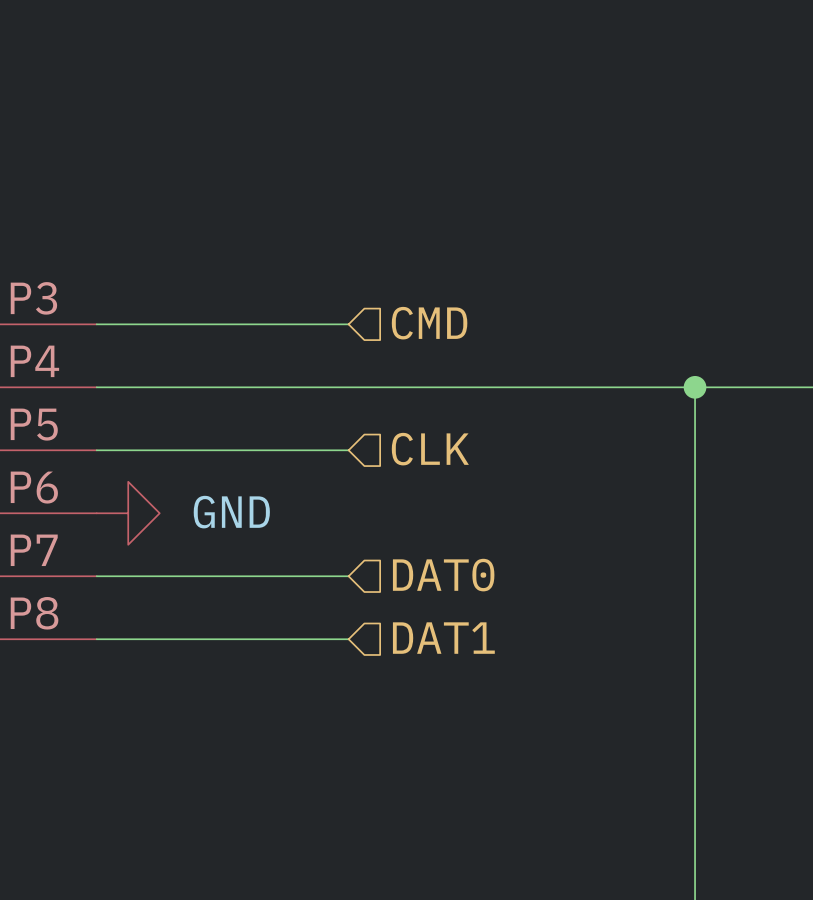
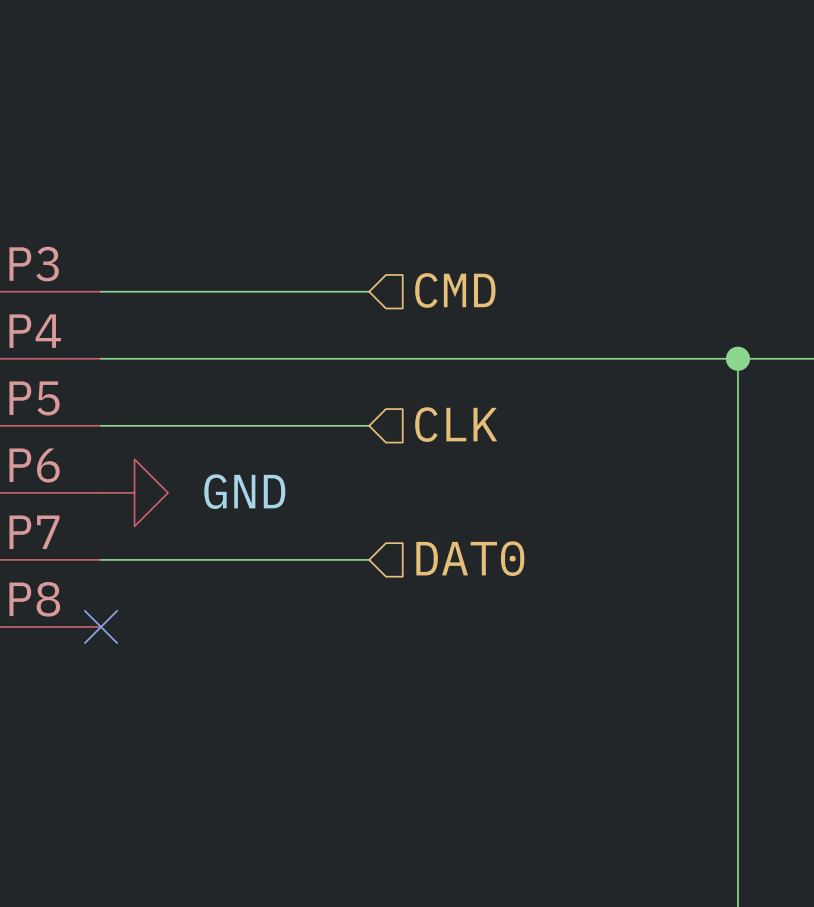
hierarchical label: DAT1 (443, 638) -> none
wire: (96, 639) (348, 639) -> none
no-connect mark: none -> (101, 626)

